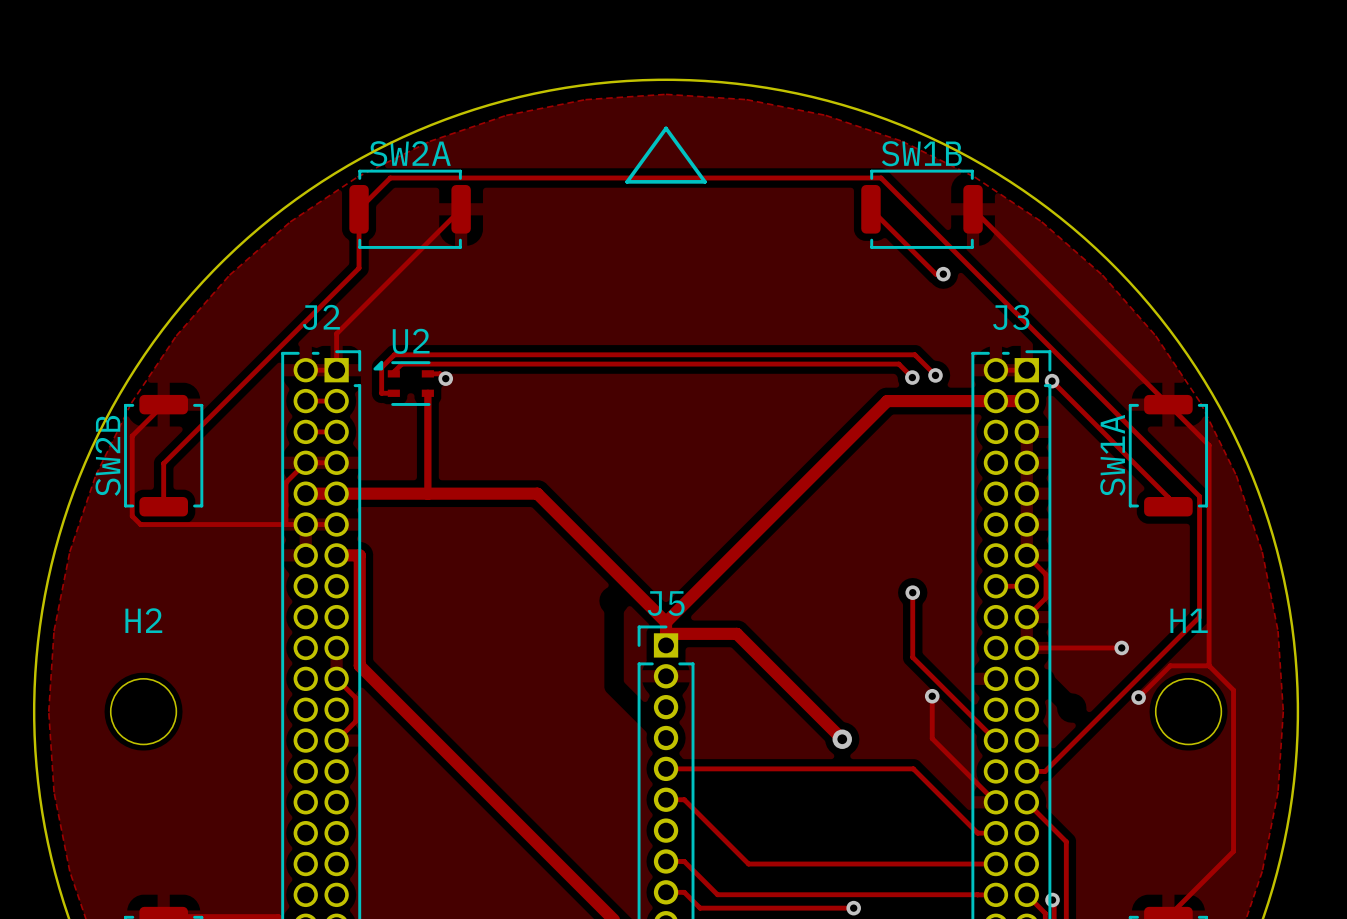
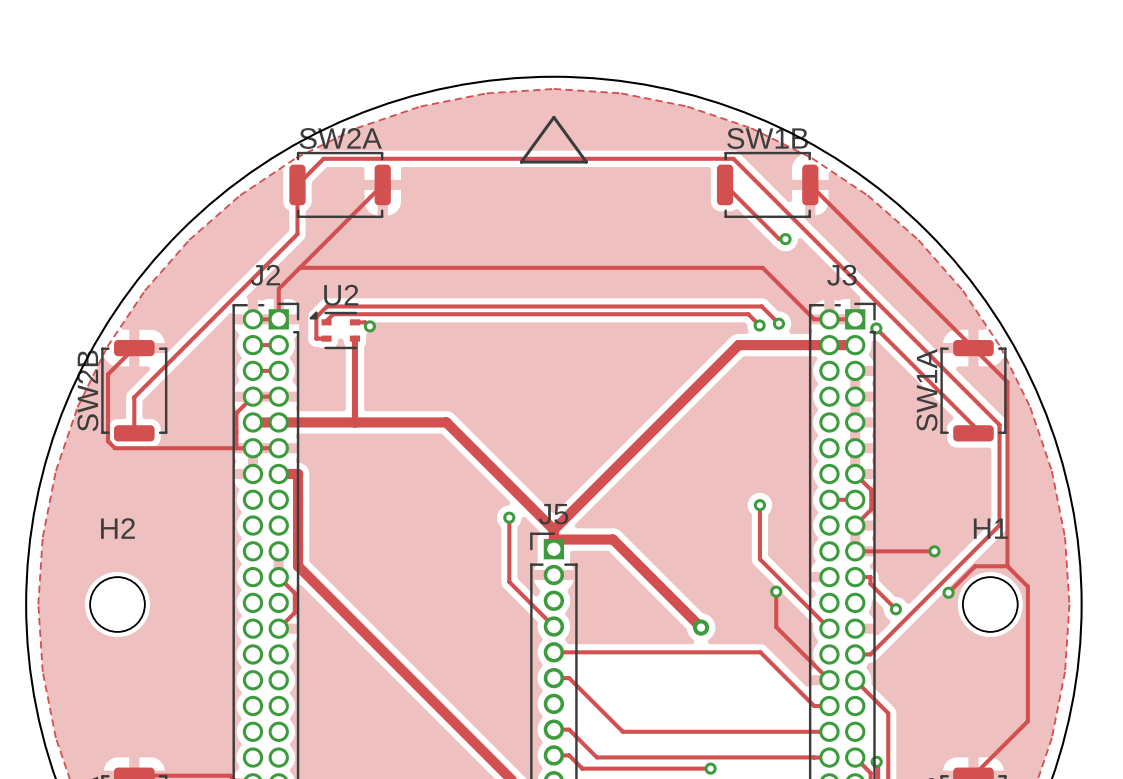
track: none -> (299, 267) (762, 267) (814, 319) (829, 319)
track: none -> (509, 517) (509, 581) (553, 626)
via: none -> (509, 517)
track: none -> (855, 577) (870, 577) (870, 583) (895, 609)
via: none -> (895, 609)

